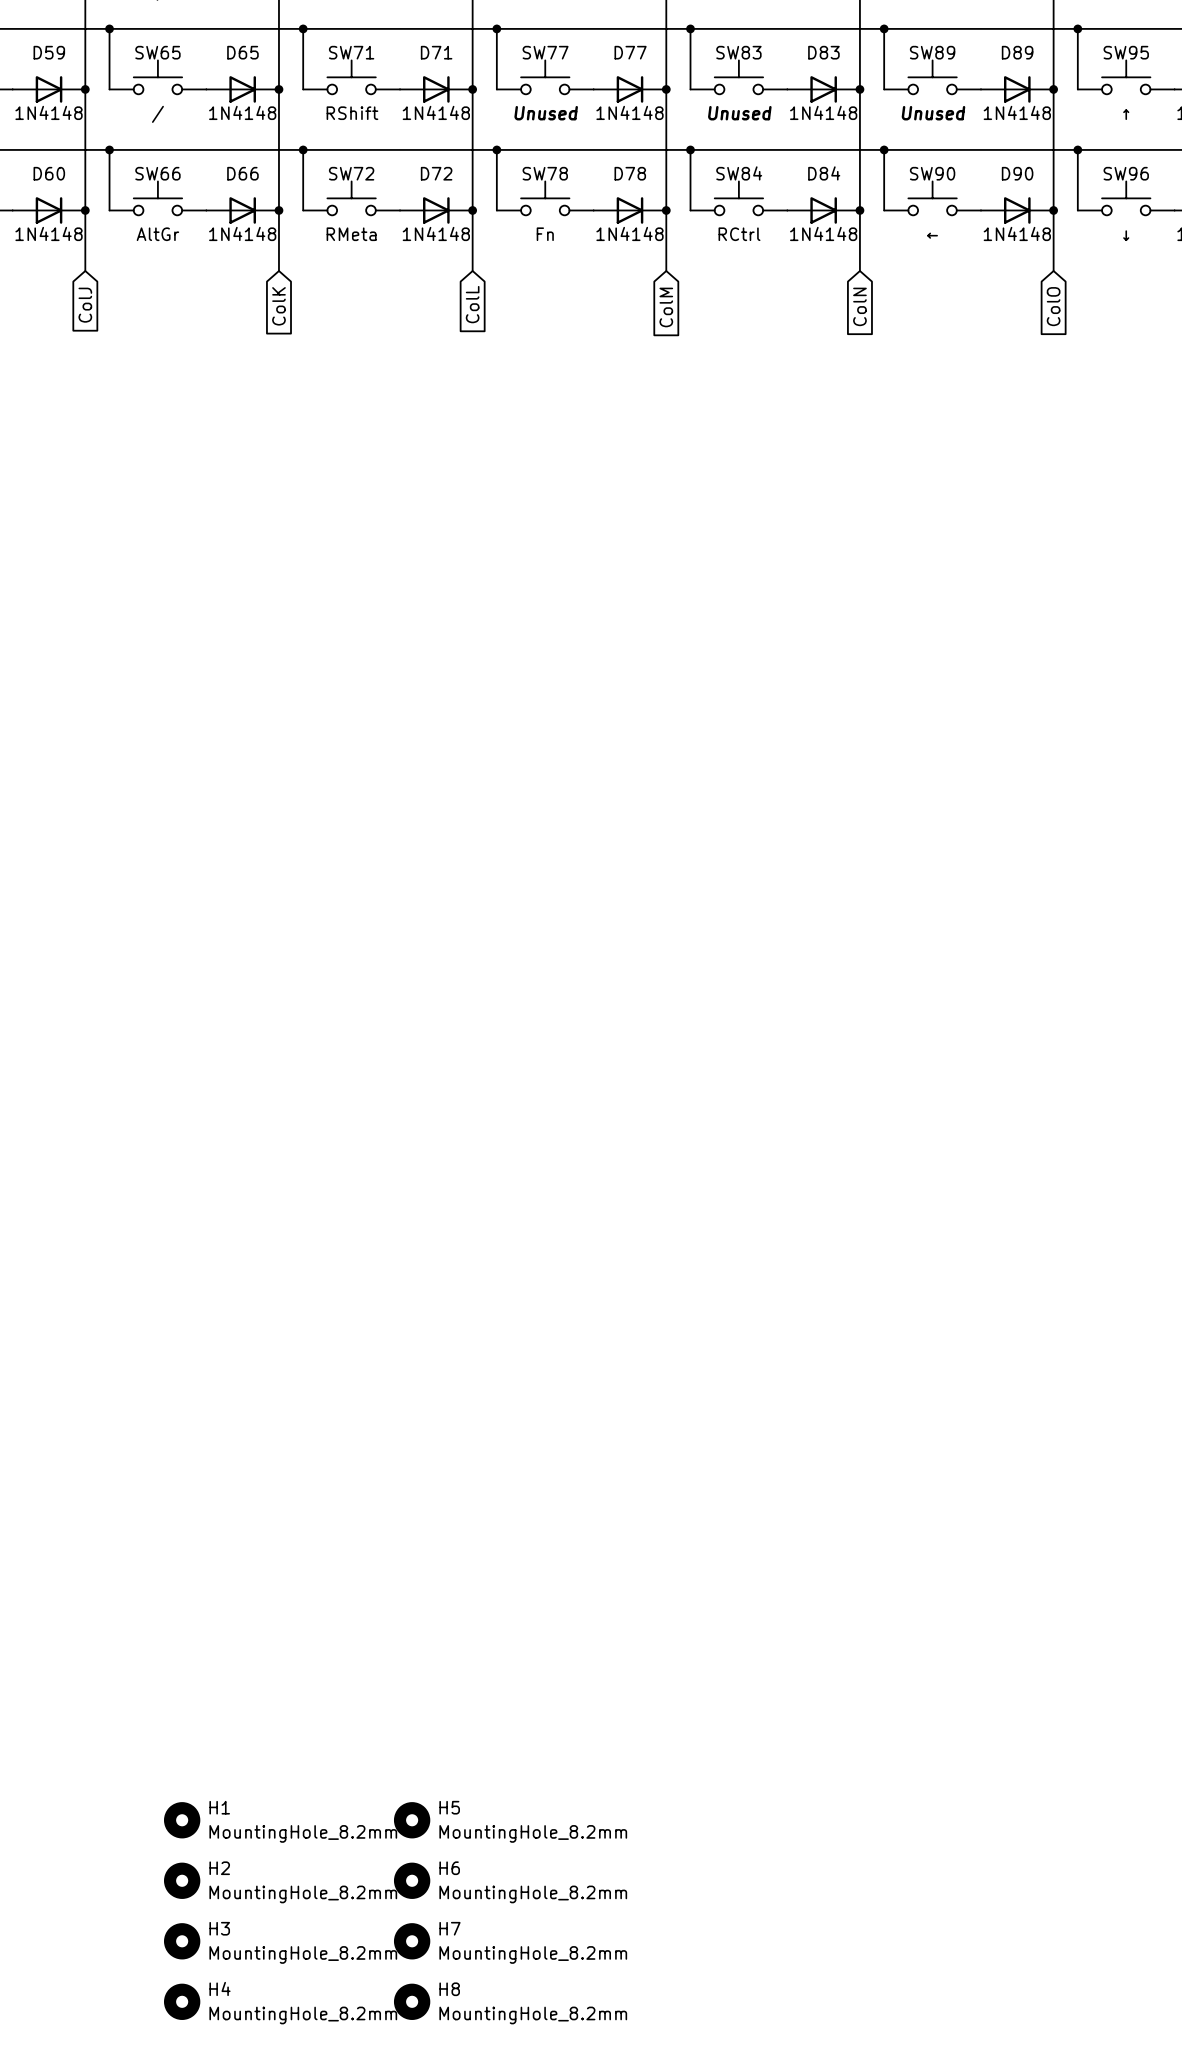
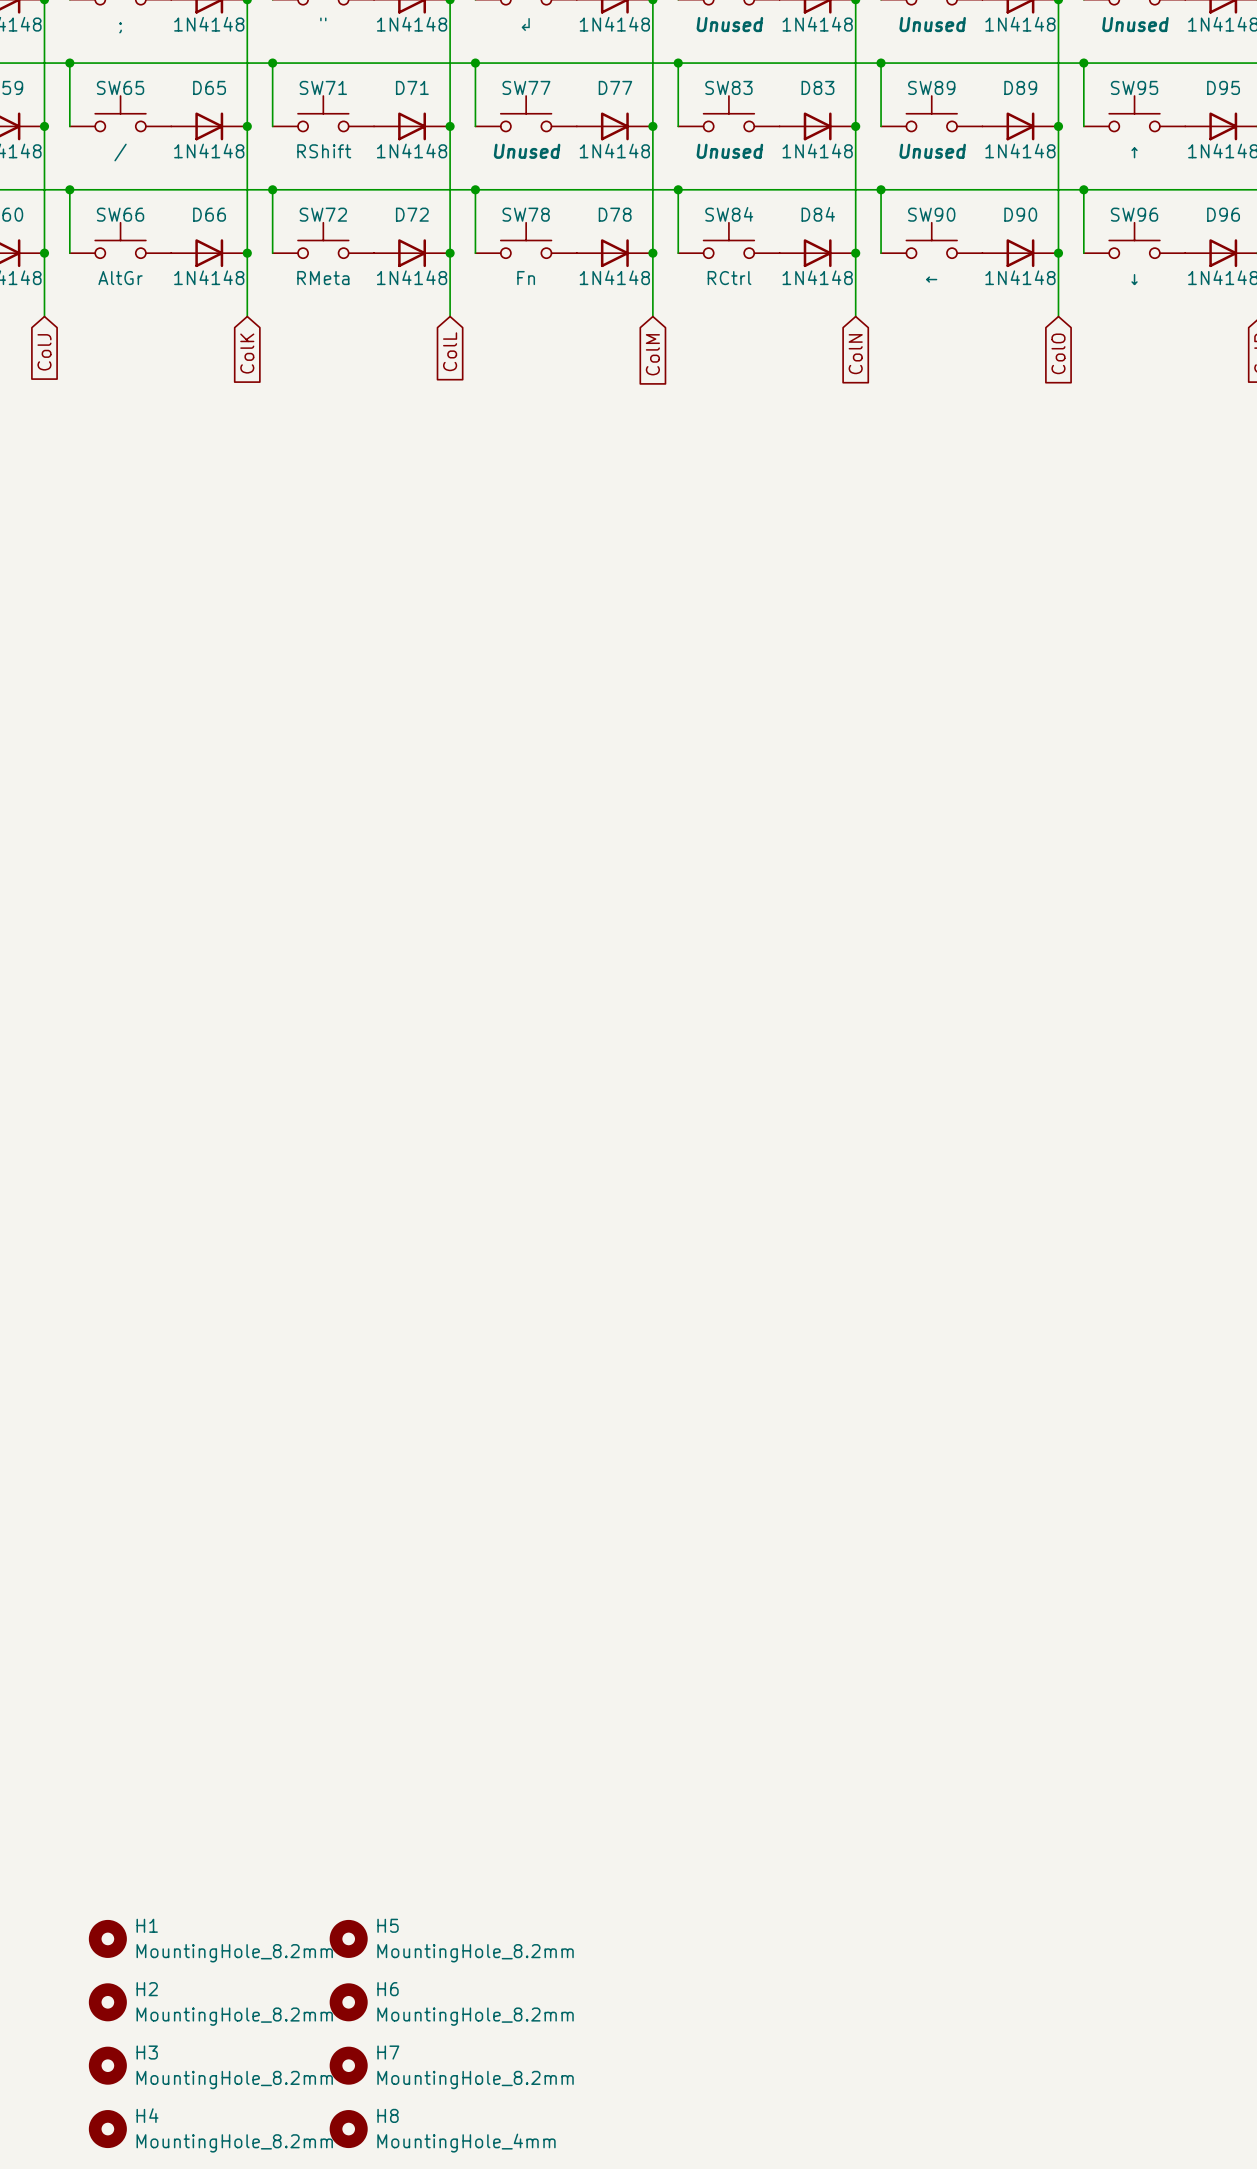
H1 position: (182, 1820) -> (107, 1938)
H5 position: (412, 1820) -> (348, 1938)
H2 position: (182, 1880) -> (107, 2002)
H6 position: (412, 1880) -> (348, 2002)
H3 position: (182, 1941) -> (107, 2065)
H7 position: (412, 1941) -> (348, 2065)
H4 position: (182, 2001) -> (107, 2129)
H8 position: (412, 2001) -> (348, 2129)
H8 value: MountingHole_8.2mm (533, 2015) -> MountingHole_4mm (466, 2143)

